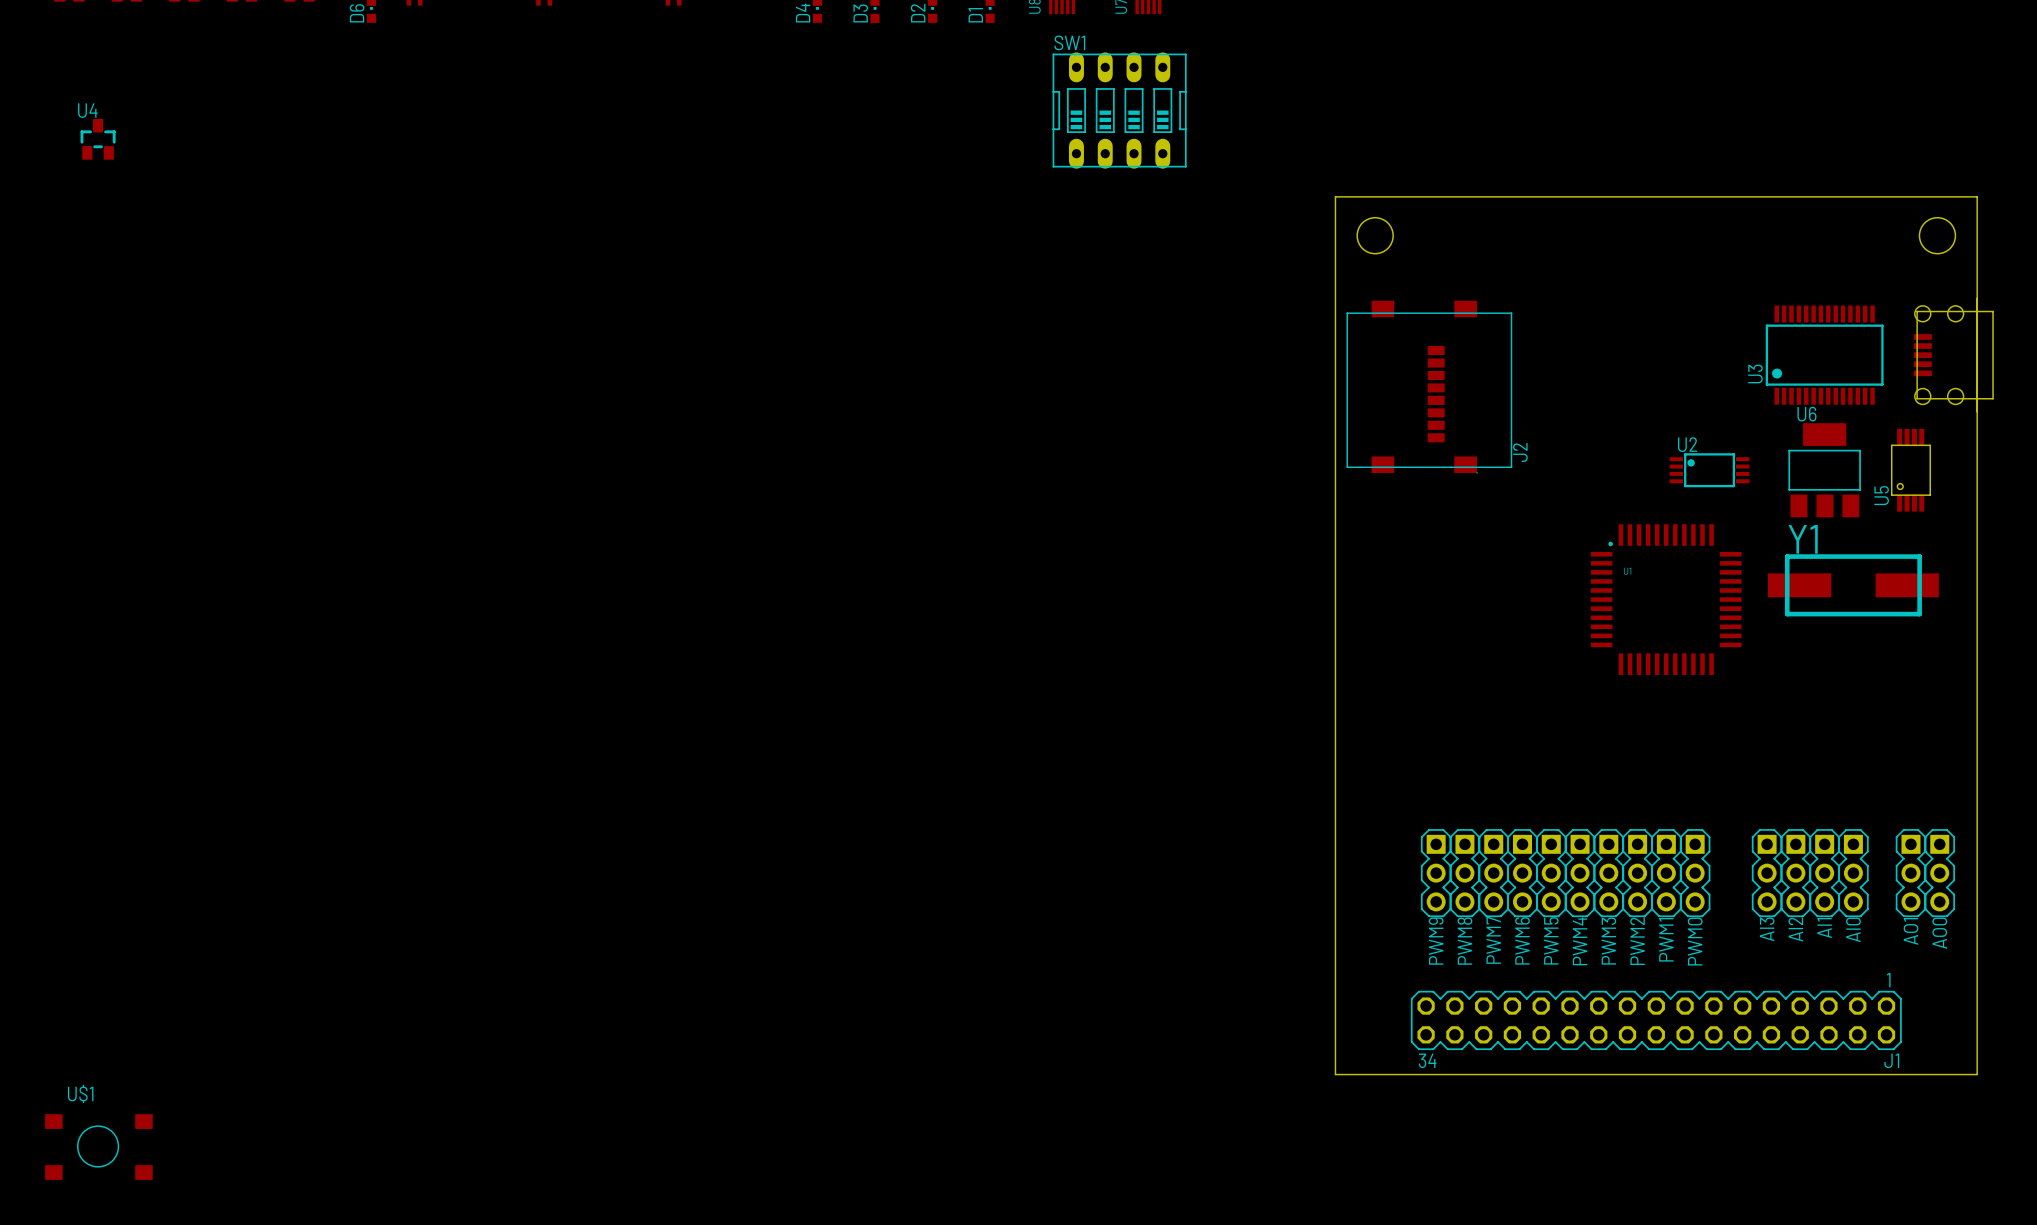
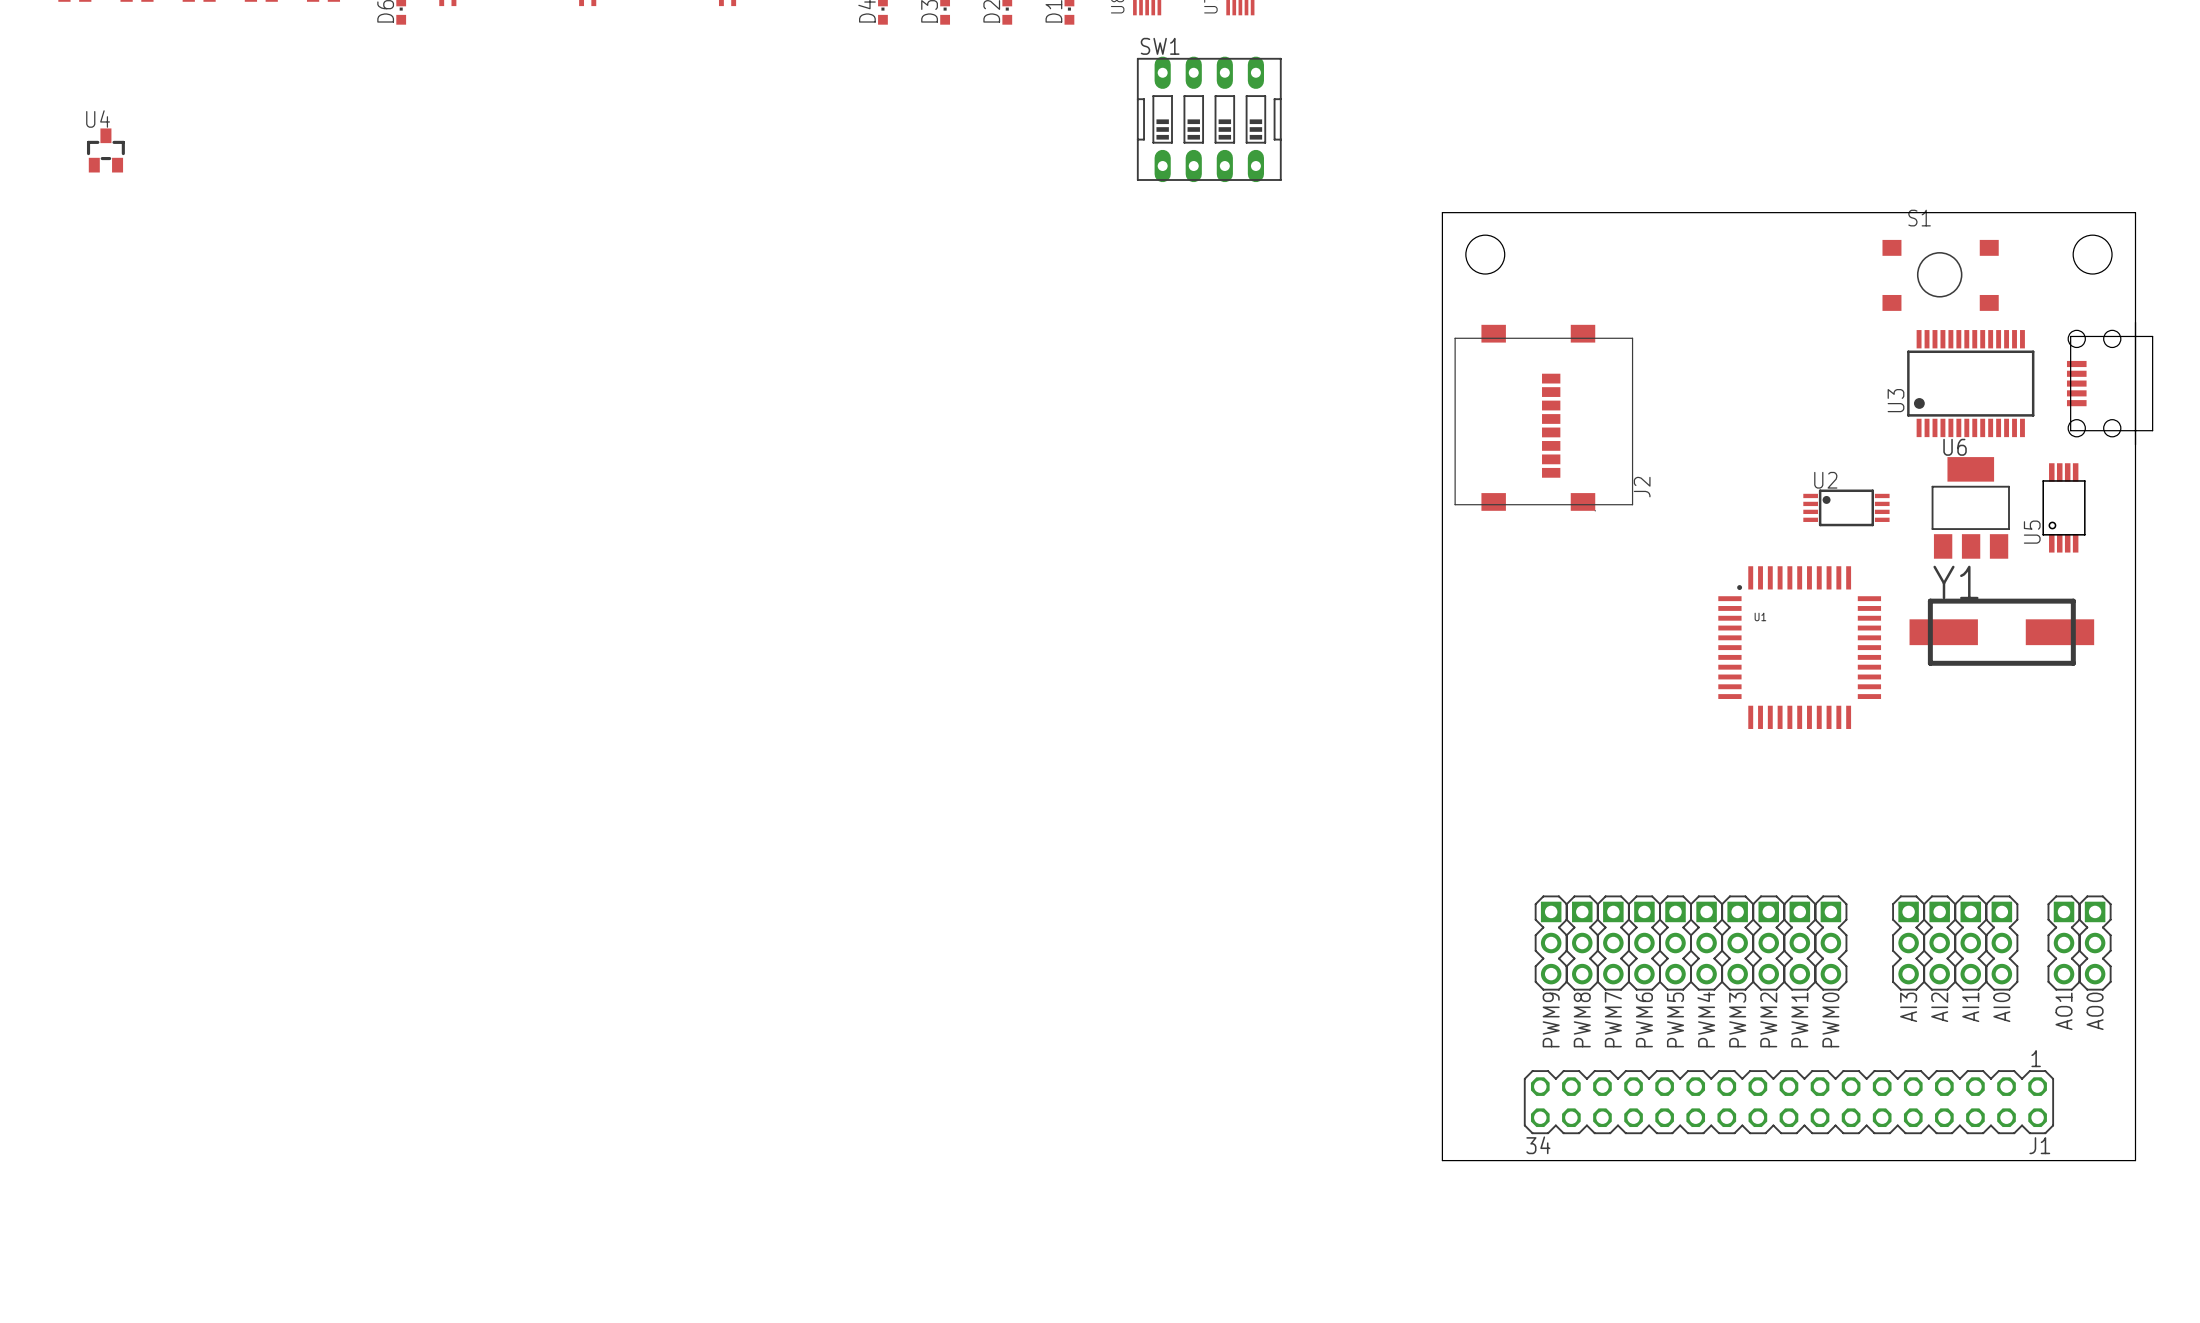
S1: none -> (1940, 275)
U$1: (98, 1147) -> none

